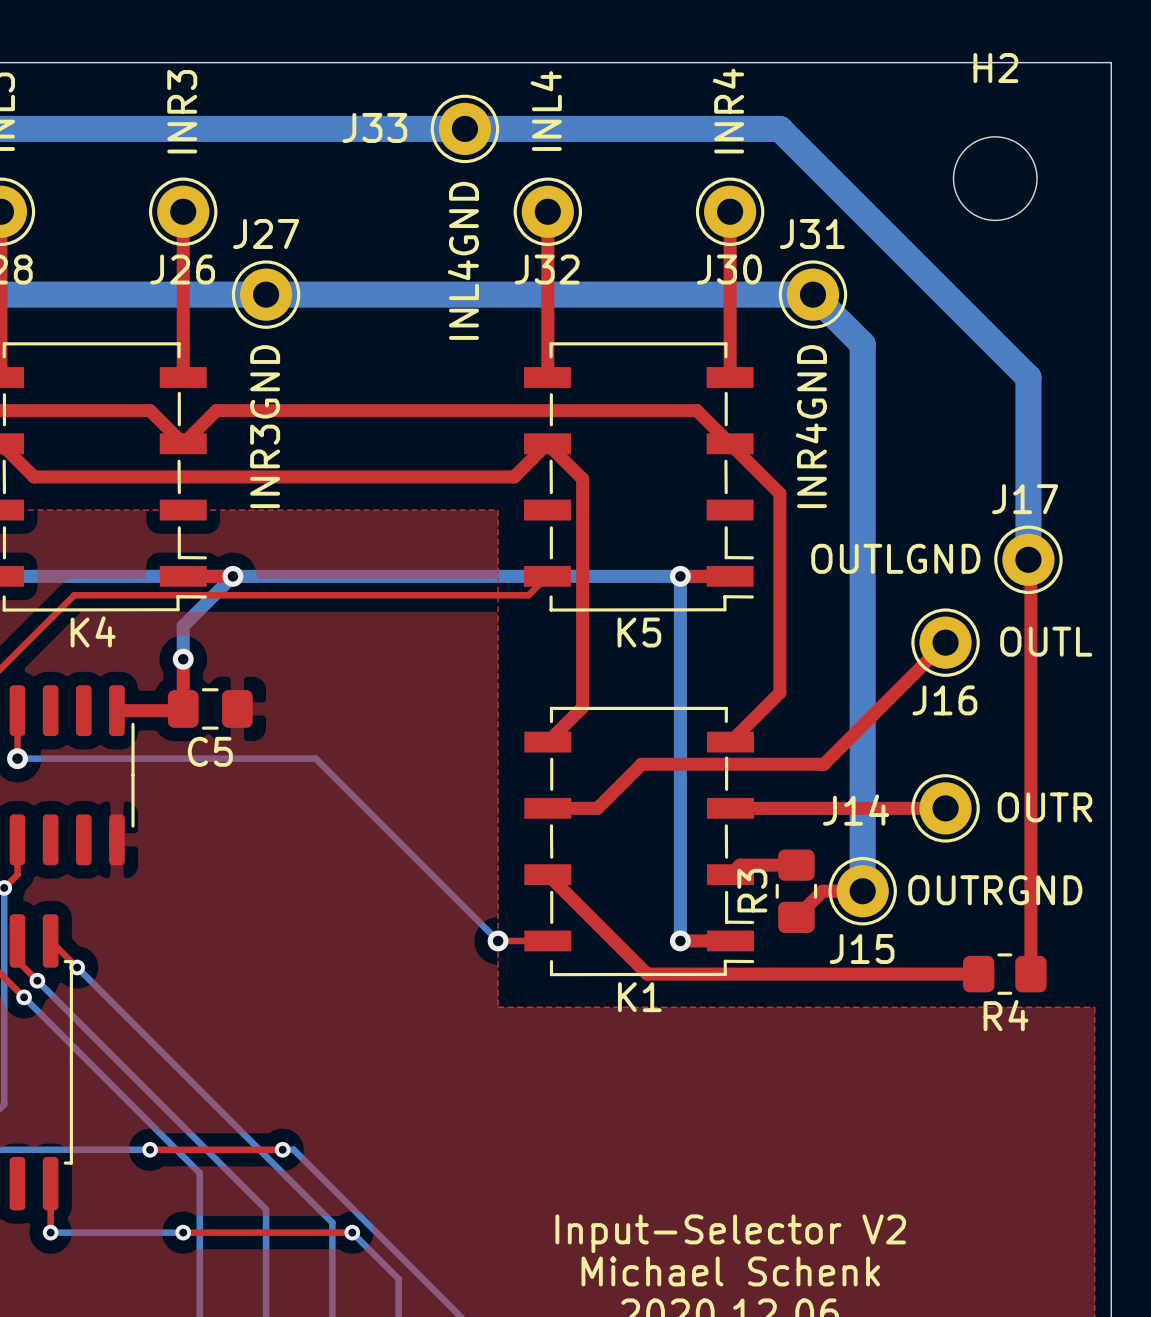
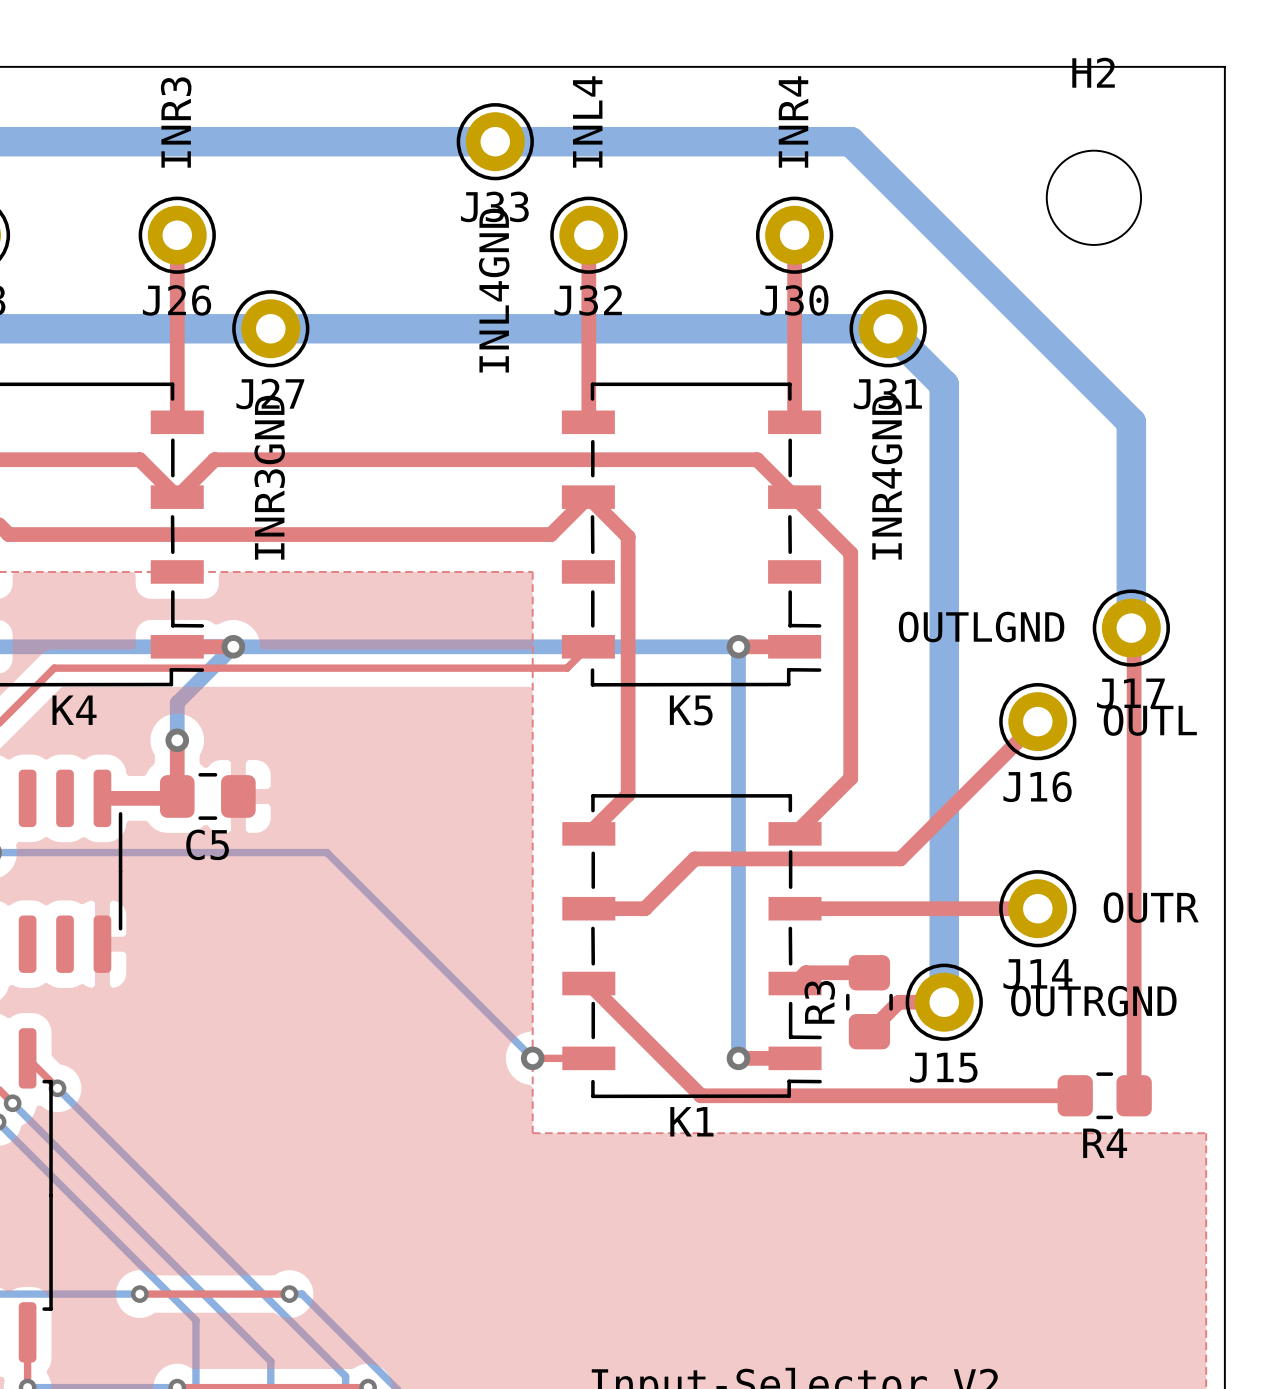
J33 name position: J33 (374, 127) -> J33 (494, 206)
J27 name position: J27 (266, 234) -> J27 (270, 393)
J31 name position: J31 (812, 234) -> J31 (887, 393)
J17 name position: J17 (1025, 499) -> J17 (1130, 693)
J14 name position: J14 (856, 810) -> J14 (1037, 974)

